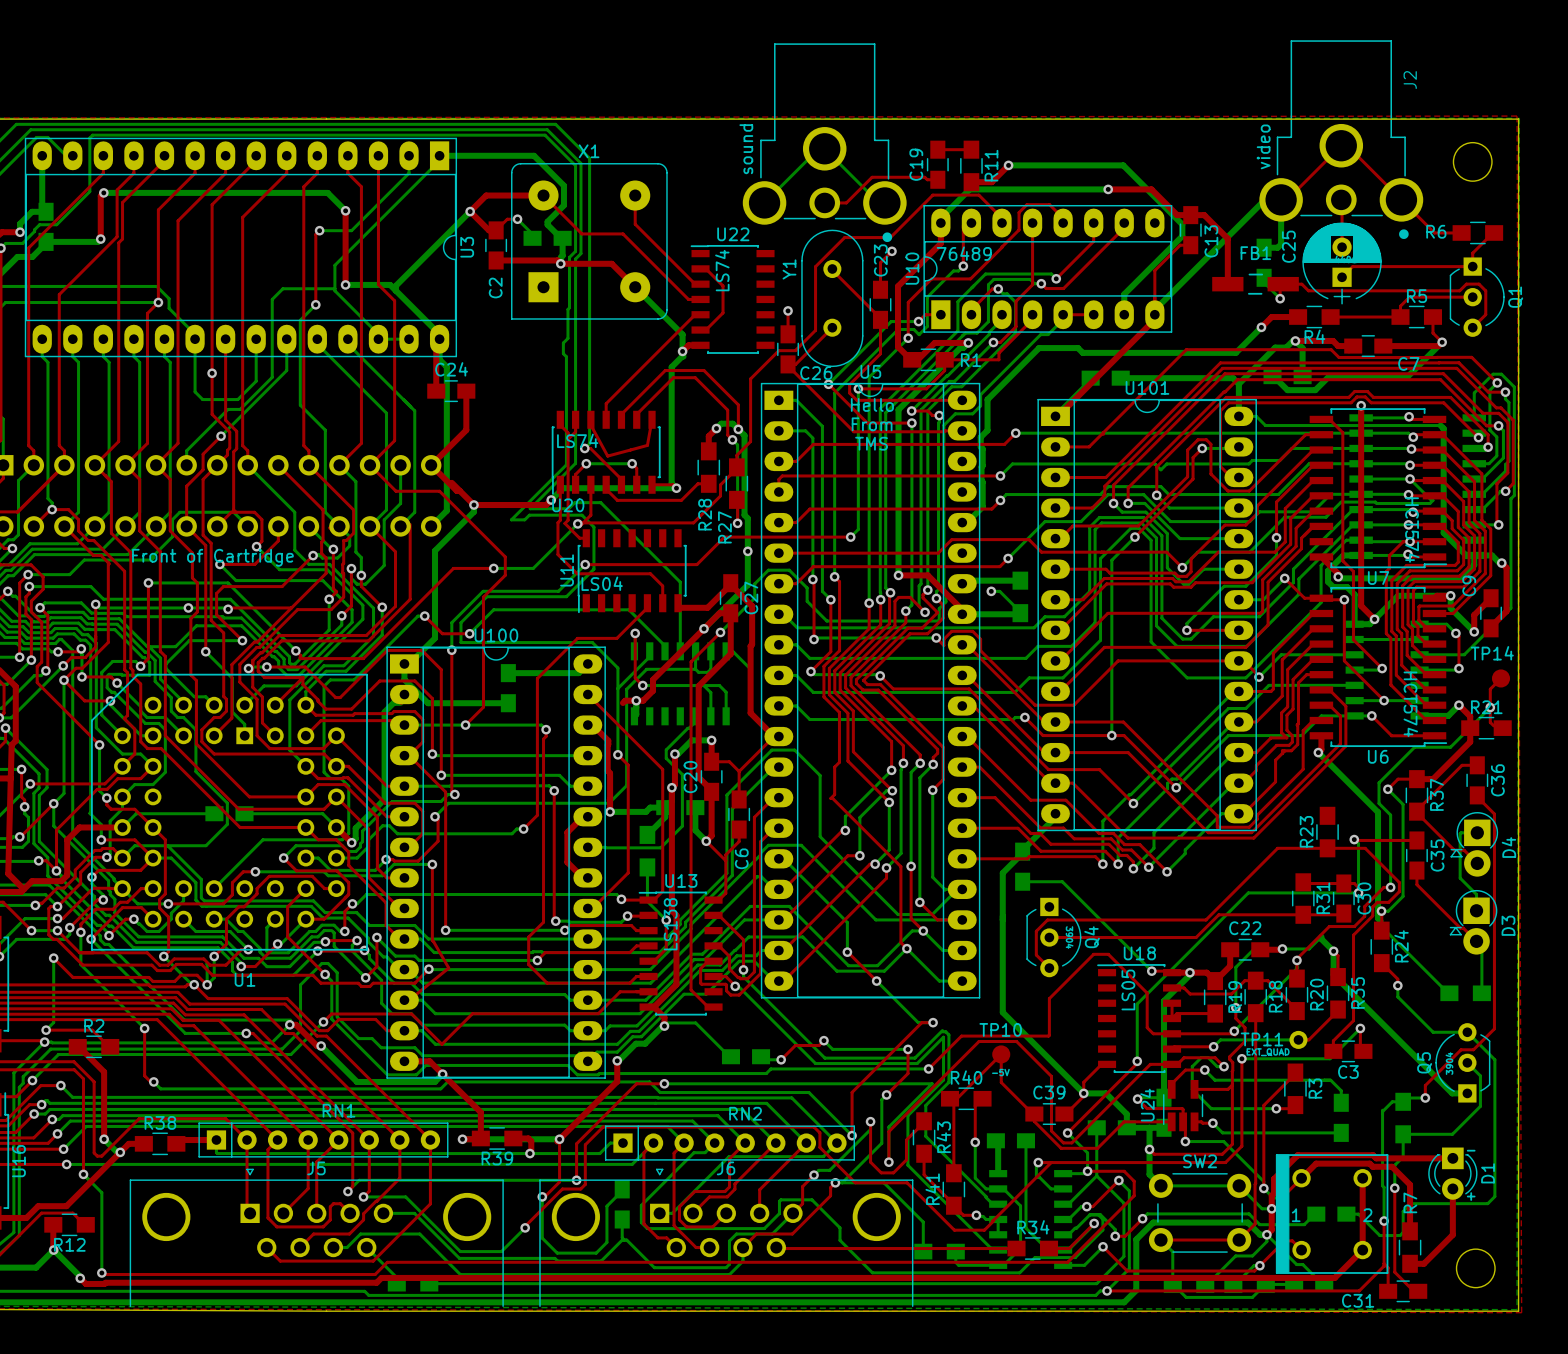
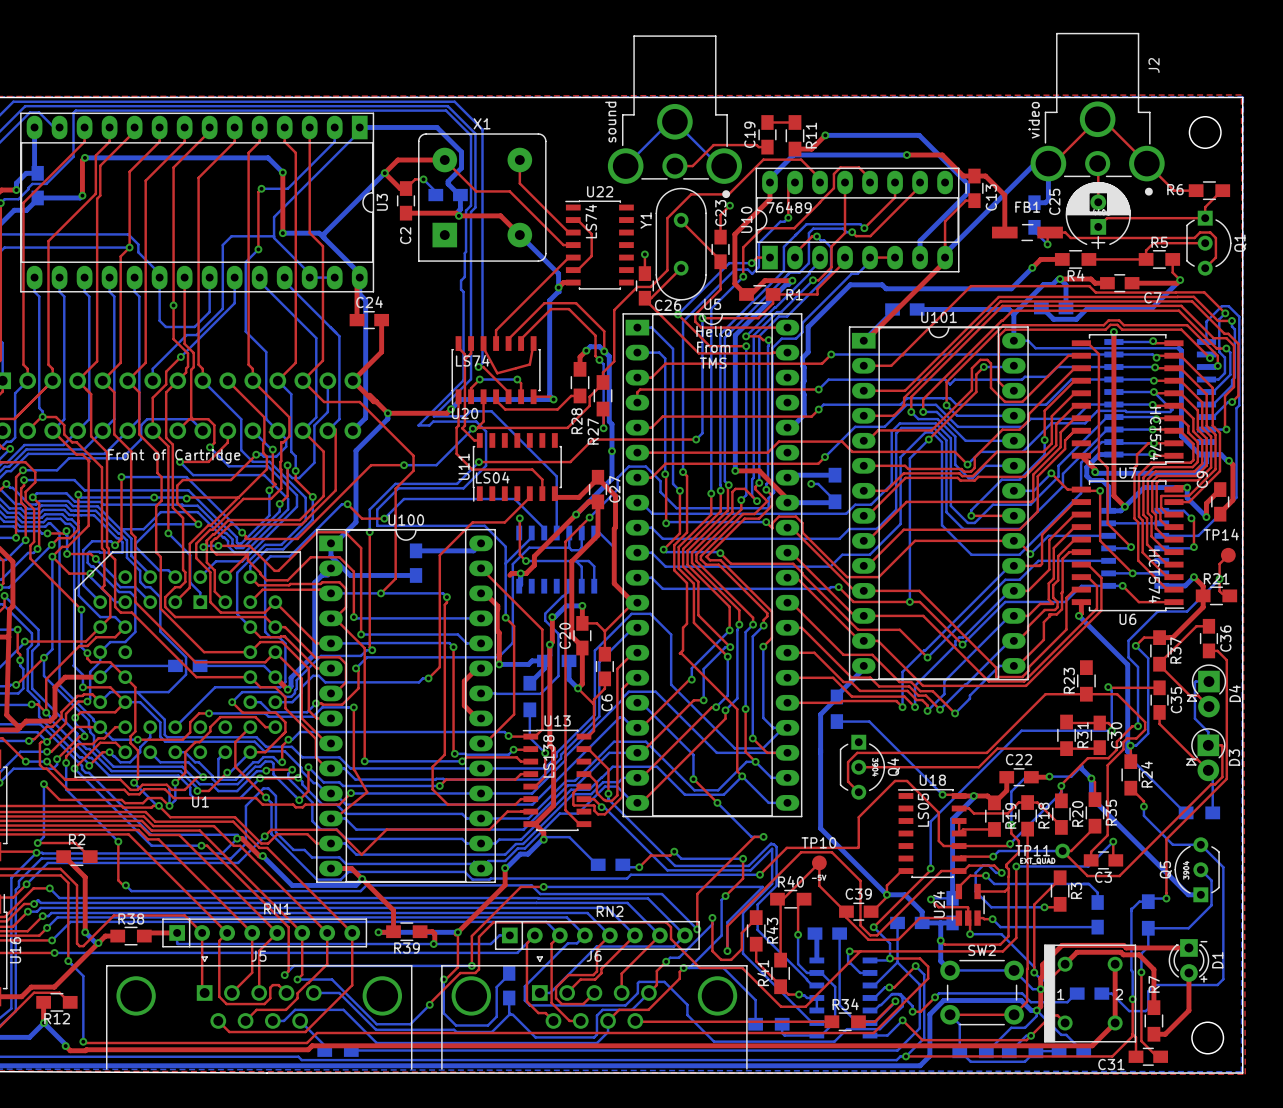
top track: (1477, 795) (1494, 814) (1494, 1028) (1473, 1049) (1461, 1049) (1425, 1085) -> (1208, 650) (1217, 650) (1226, 660) (1226, 778) (1166, 839) (1166, 888)
top track: none -> (1208, 745) (1222, 746) (1222, 777) (1215, 784) (1211, 784) (1119, 876) (1087, 876) (1062, 851)

